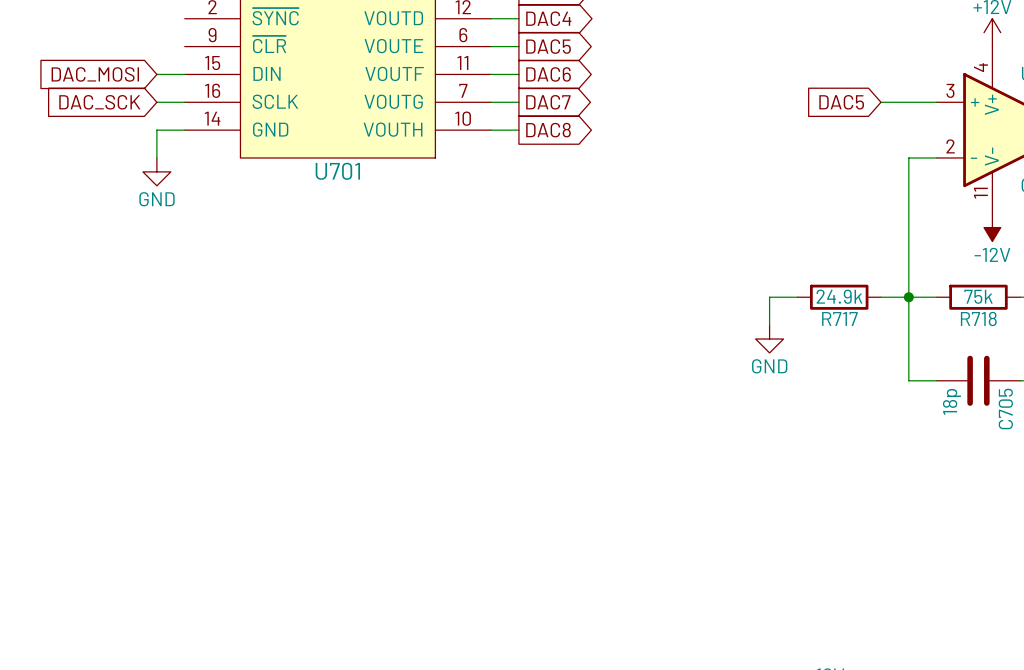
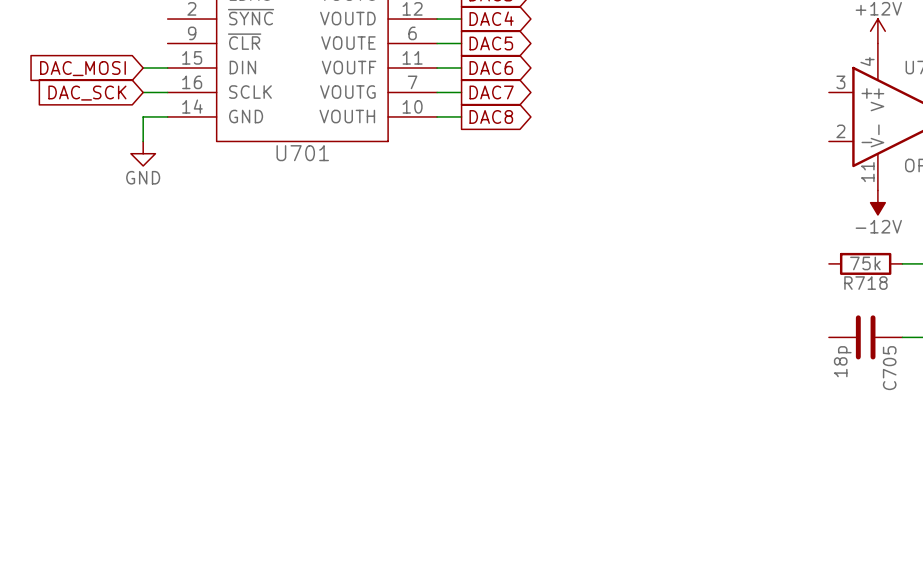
global label: DAC5 (841, 102) -> none
wire: (880, 102) (936, 102) -> none
wire: (936, 157) (908, 157) (908, 380) (936, 380) -> none
wire: (797, 297) (769, 297) (769, 325) -> none
R717: 24.9k (839, 297) -> none
wire: (880, 297) (936, 297) -> none
junction: (908, 297) -> none
power symbol: GND (769, 339) -> none

